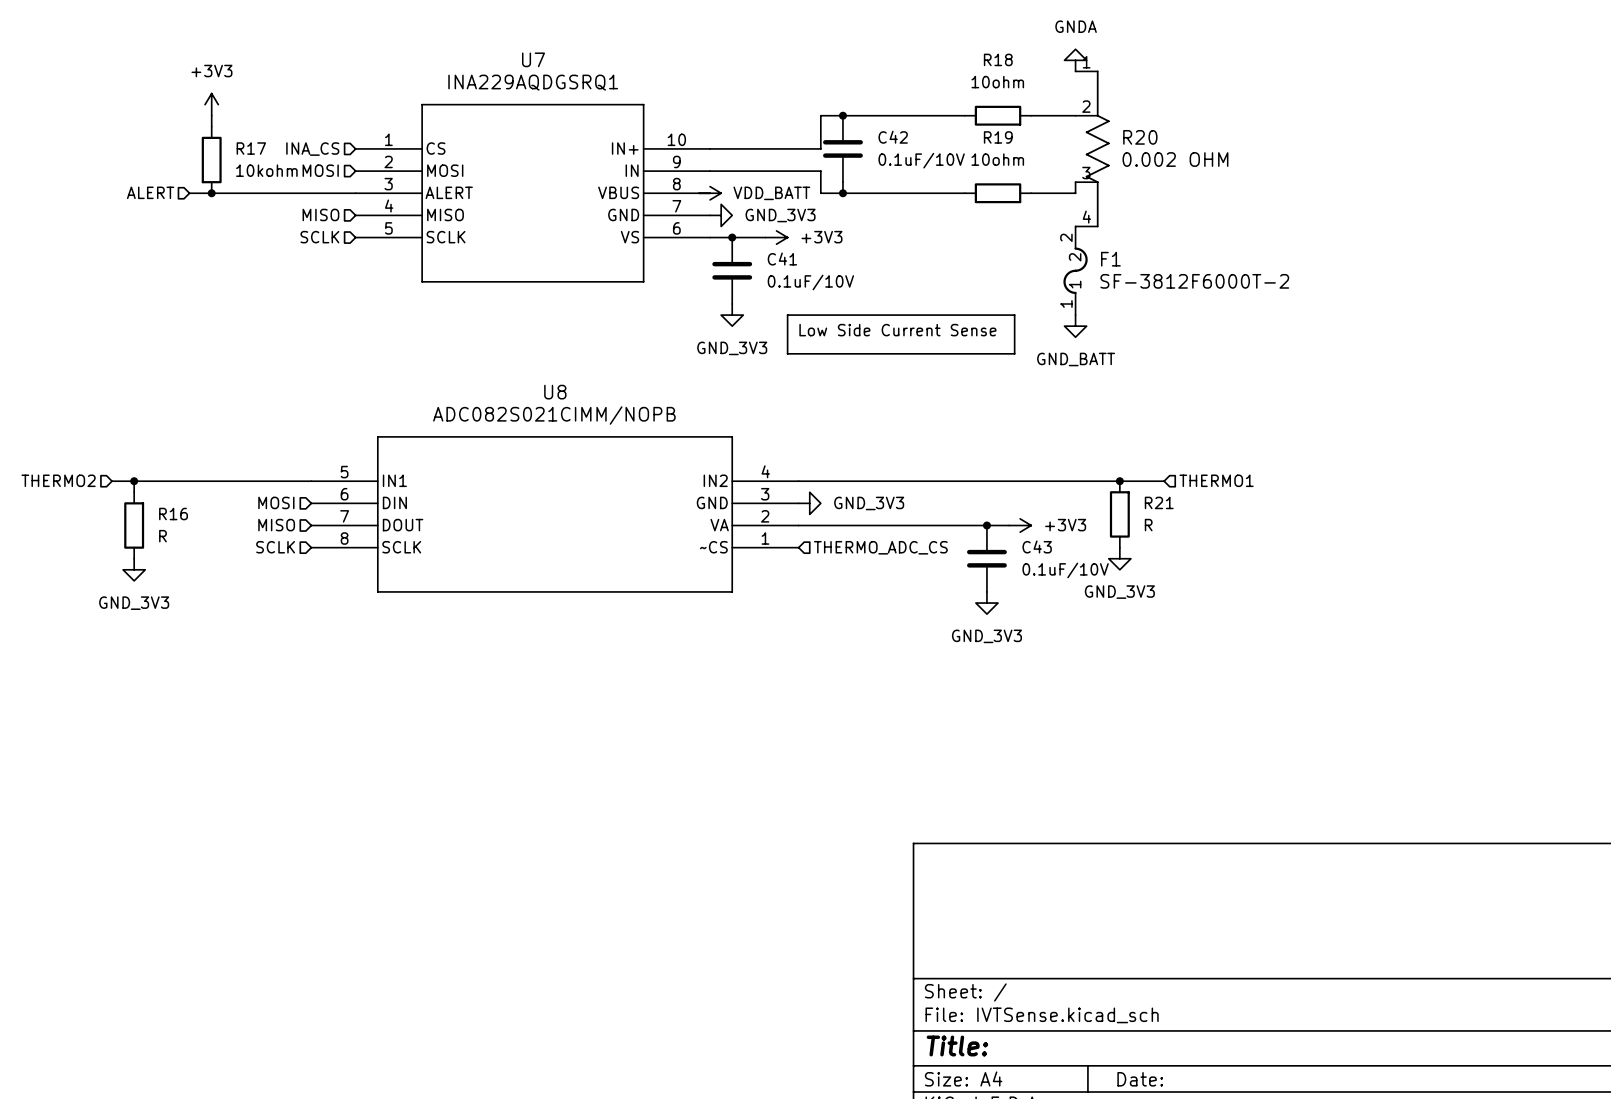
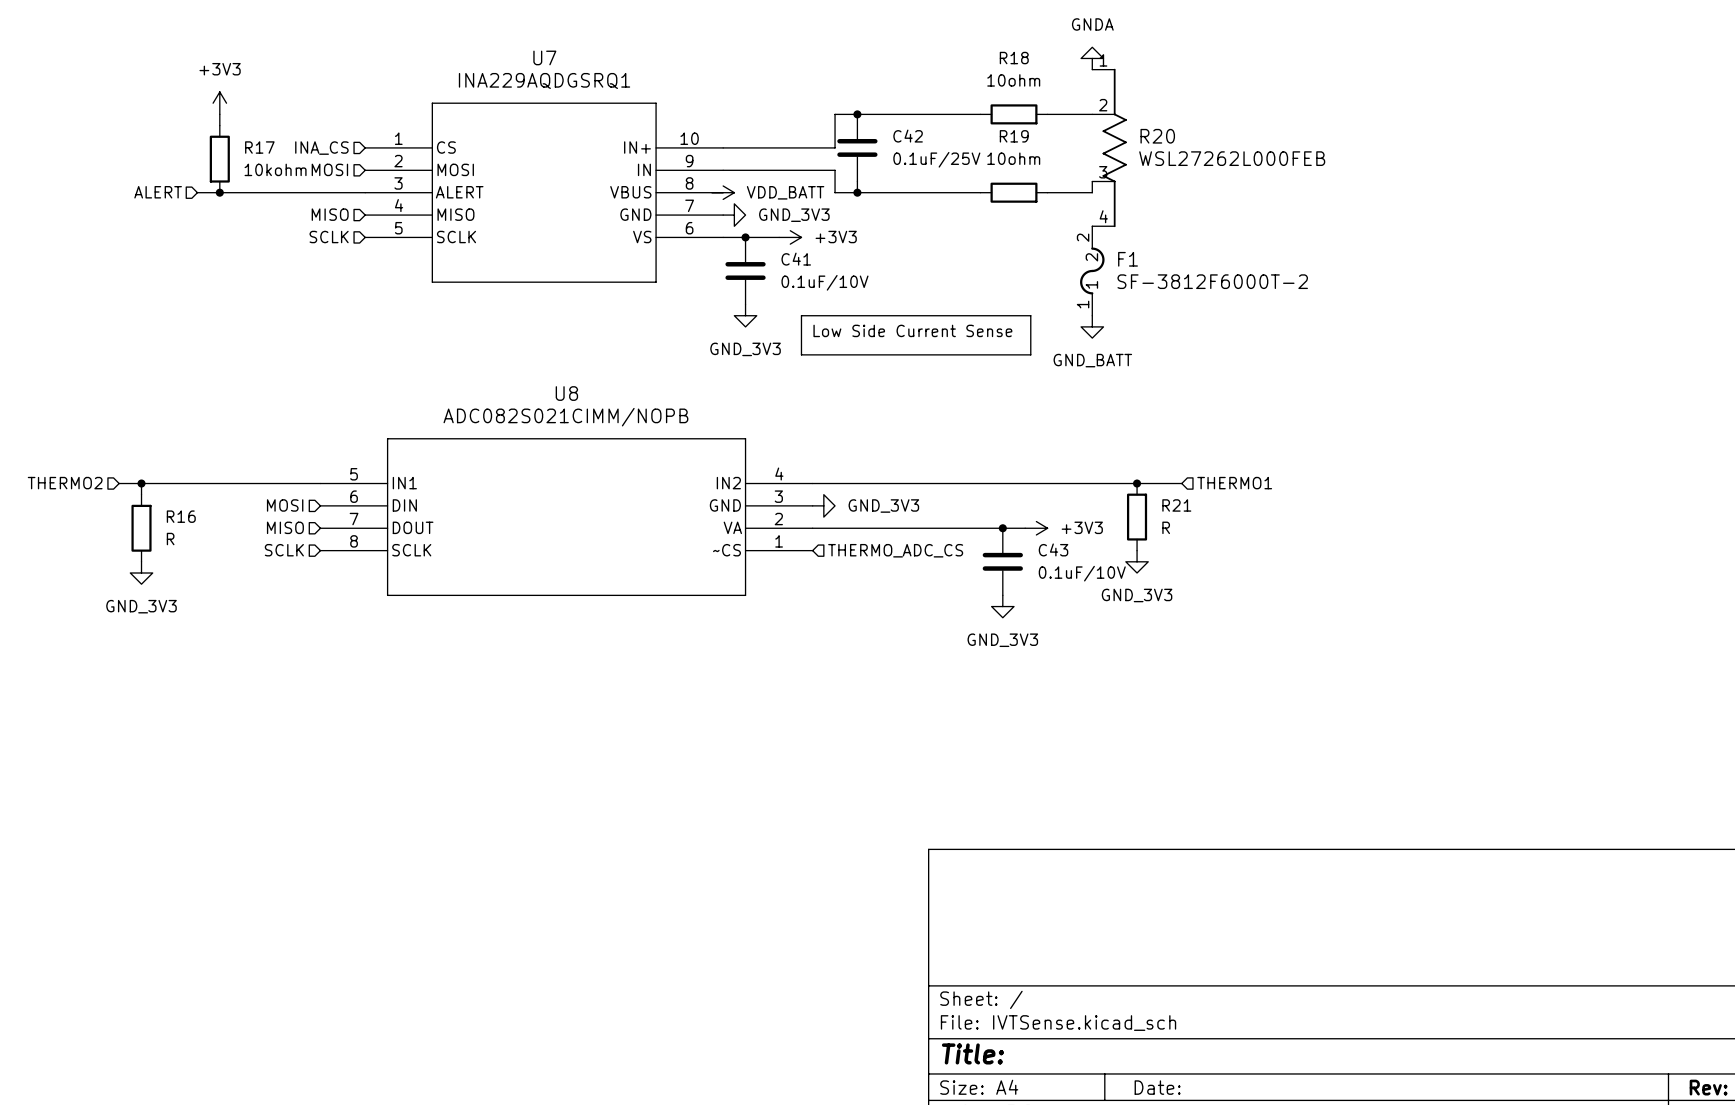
R20 value: 0.002 OHM (1175, 159) -> WSL27262L000FEB (1232, 158)
C42 value: 0.1uF/10V (921, 160) -> 0.1uF/25V (936, 159)

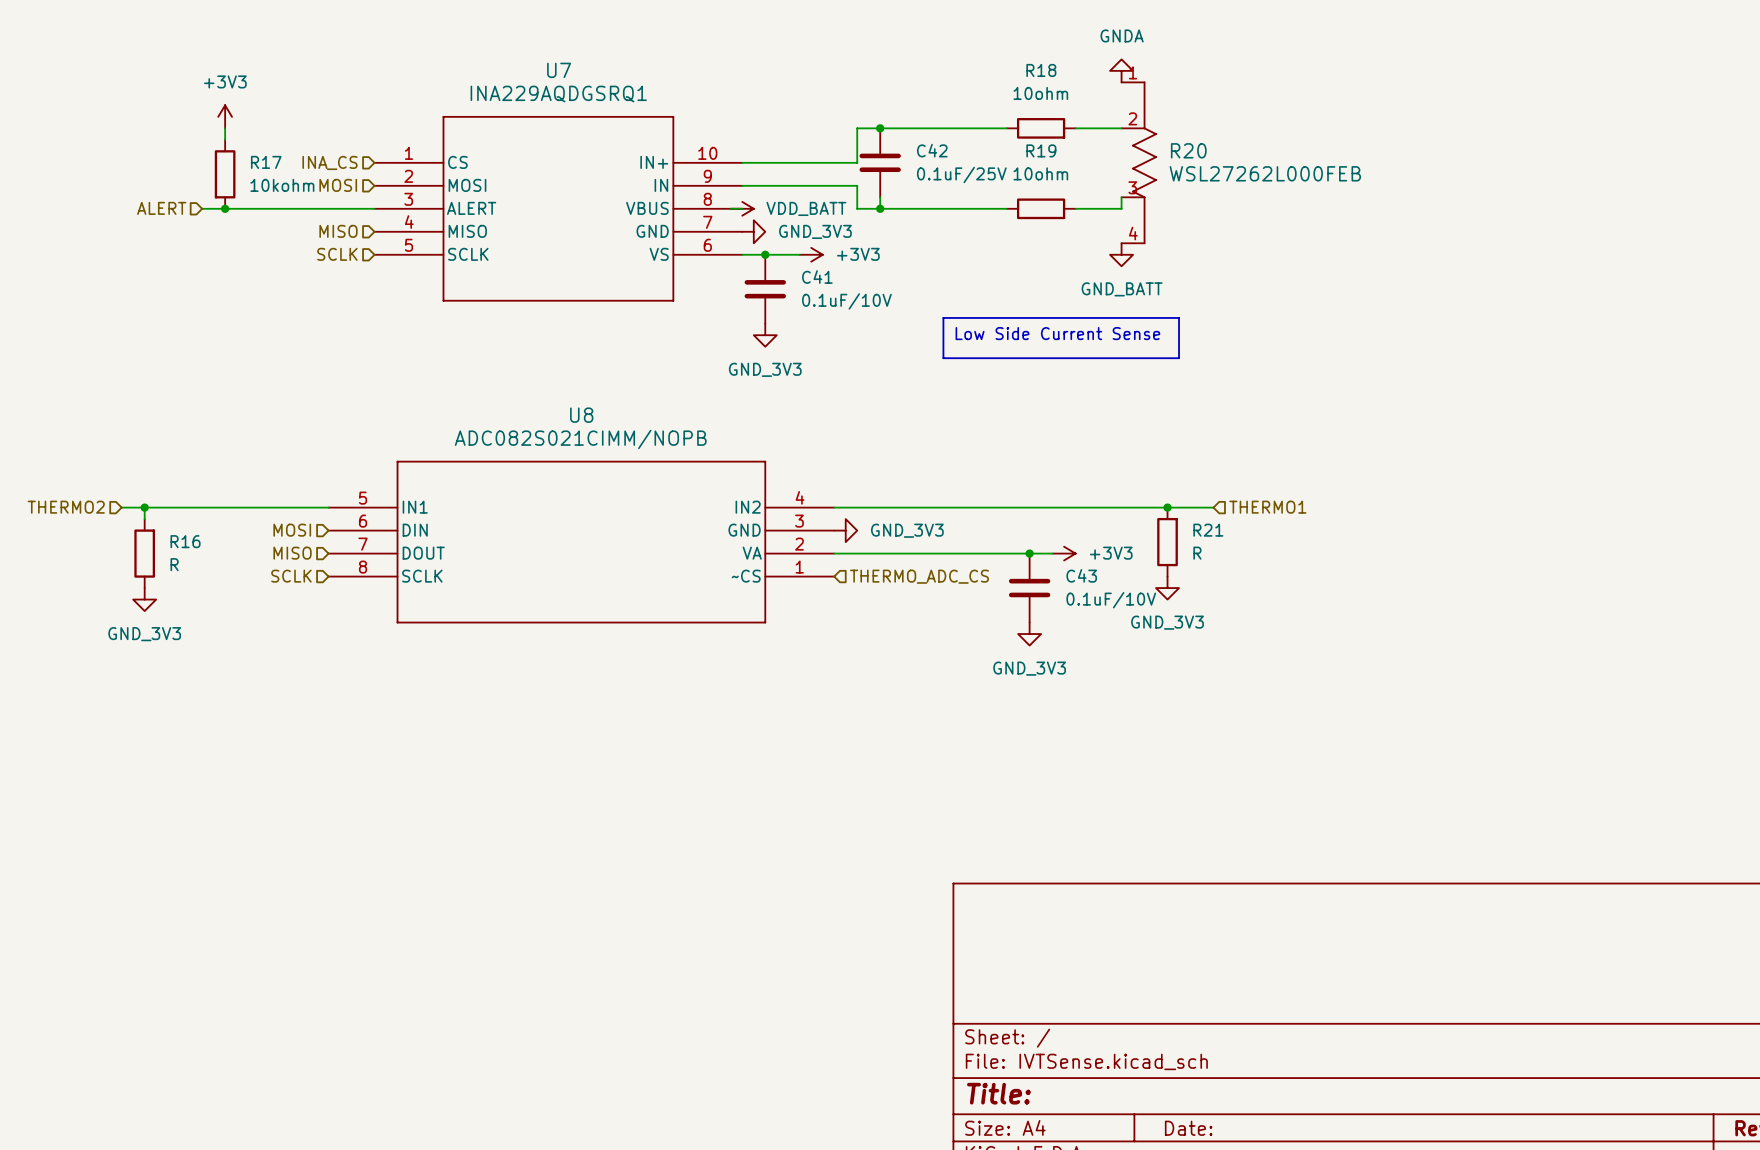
F1: SF-3812F6000T-2 (1092, 270) -> none
line: (801, 315) (1030, 315) (1030, 354) (801, 354) (801, 315) -> (943, 317) (1179, 317) (1179, 358) (943, 358) (943, 317)
power symbol position: GND_BATT (1092, 326) -> GND_BATT (1121, 254)
text position: Low Side Current Sense (912, 330) -> Low Side Current Sense (1057, 333)

